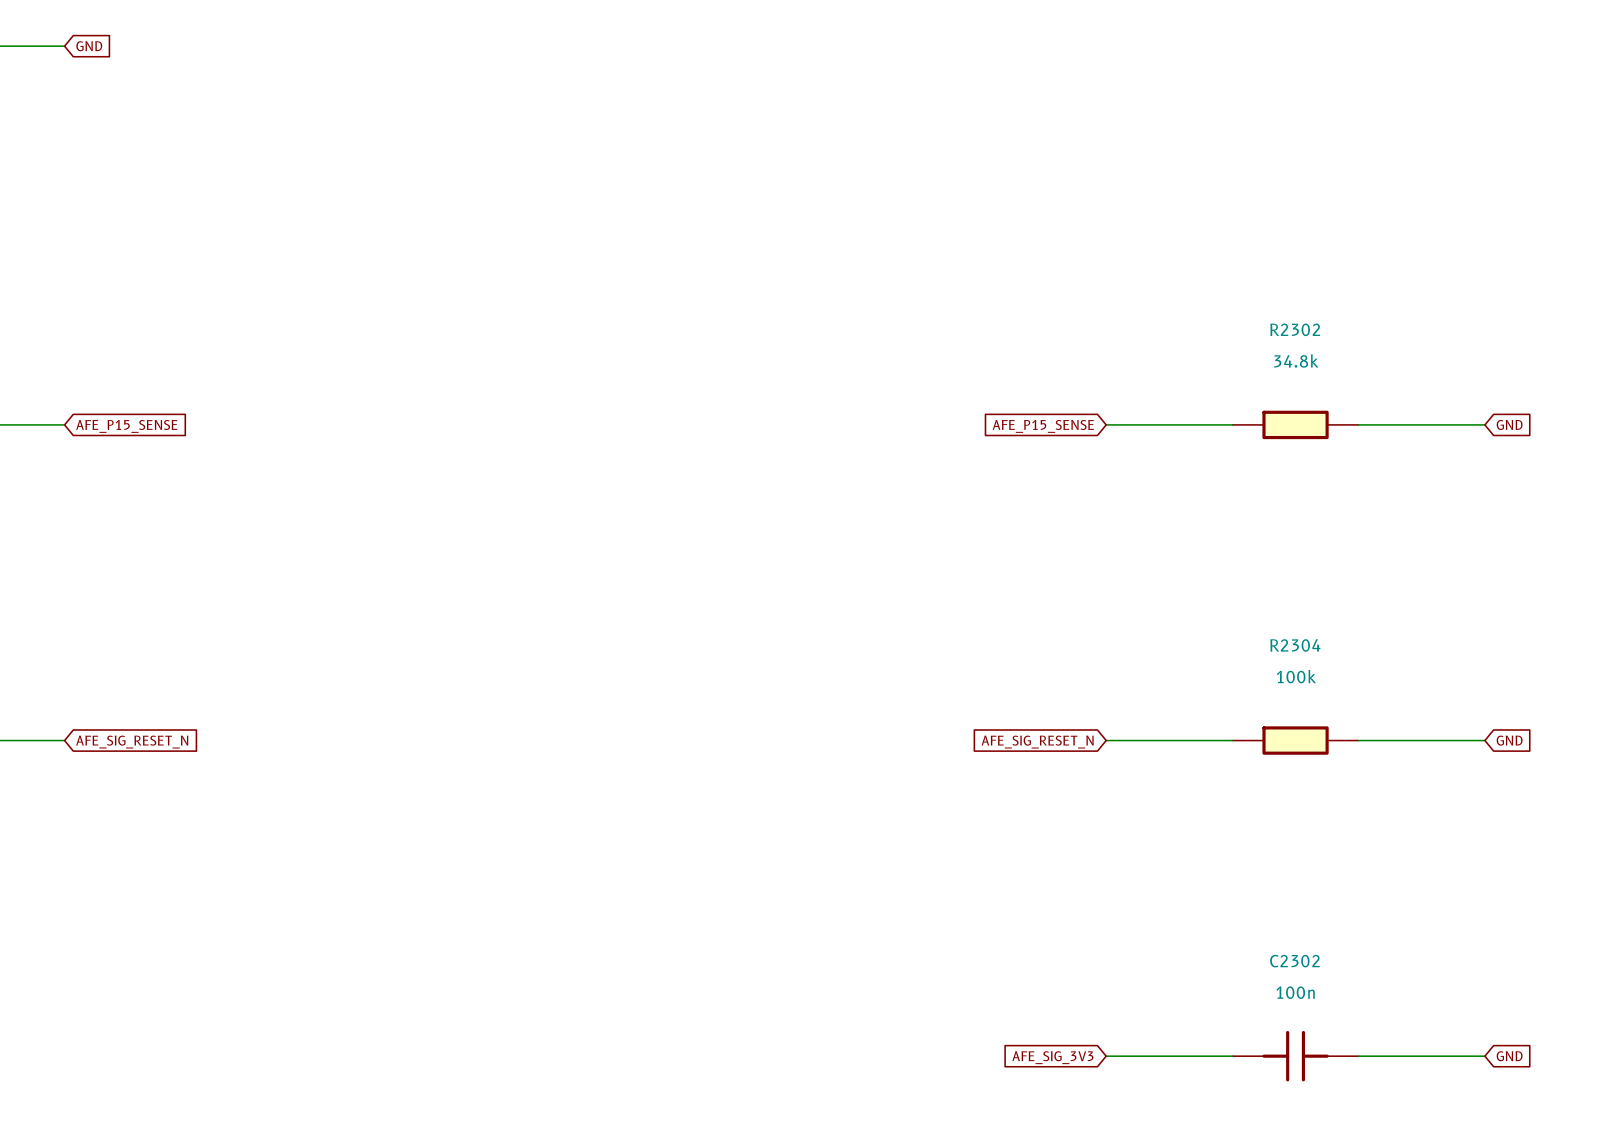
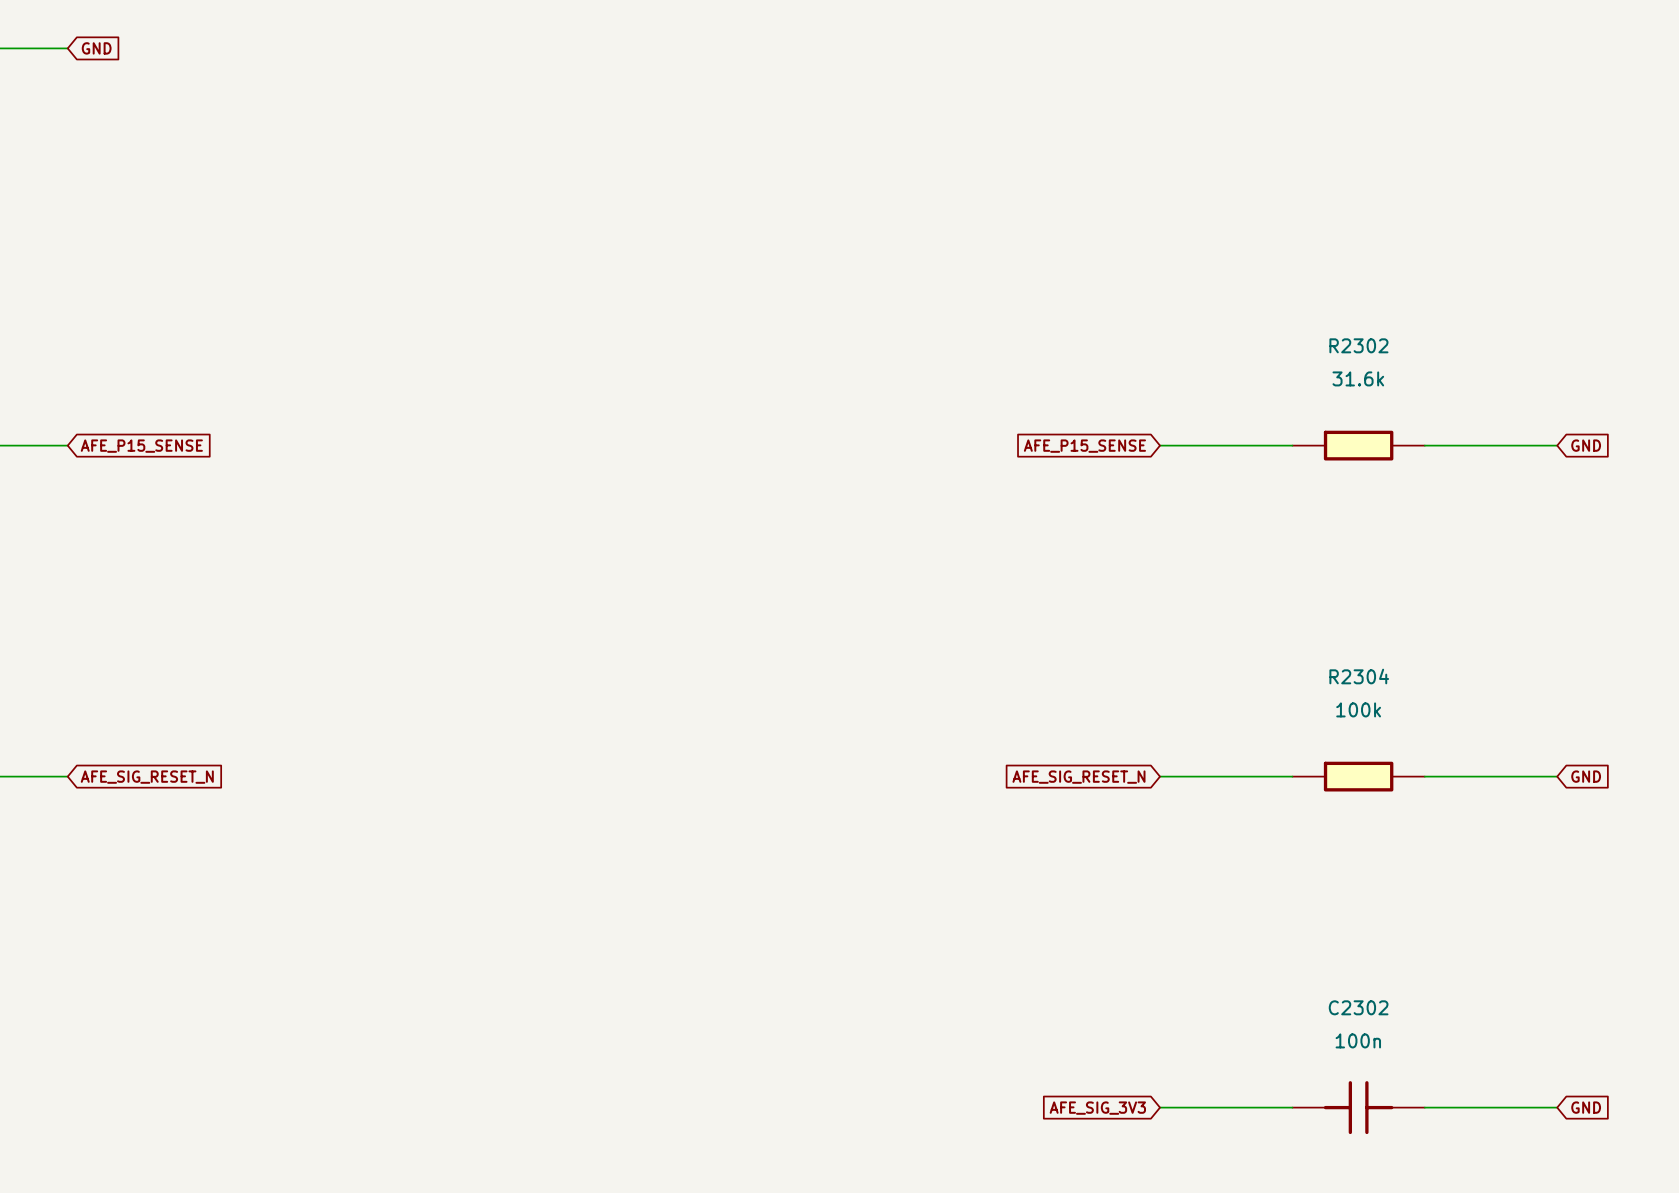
R2302 value: 34.8k (1296, 360) -> 31.6k (1358, 378)

